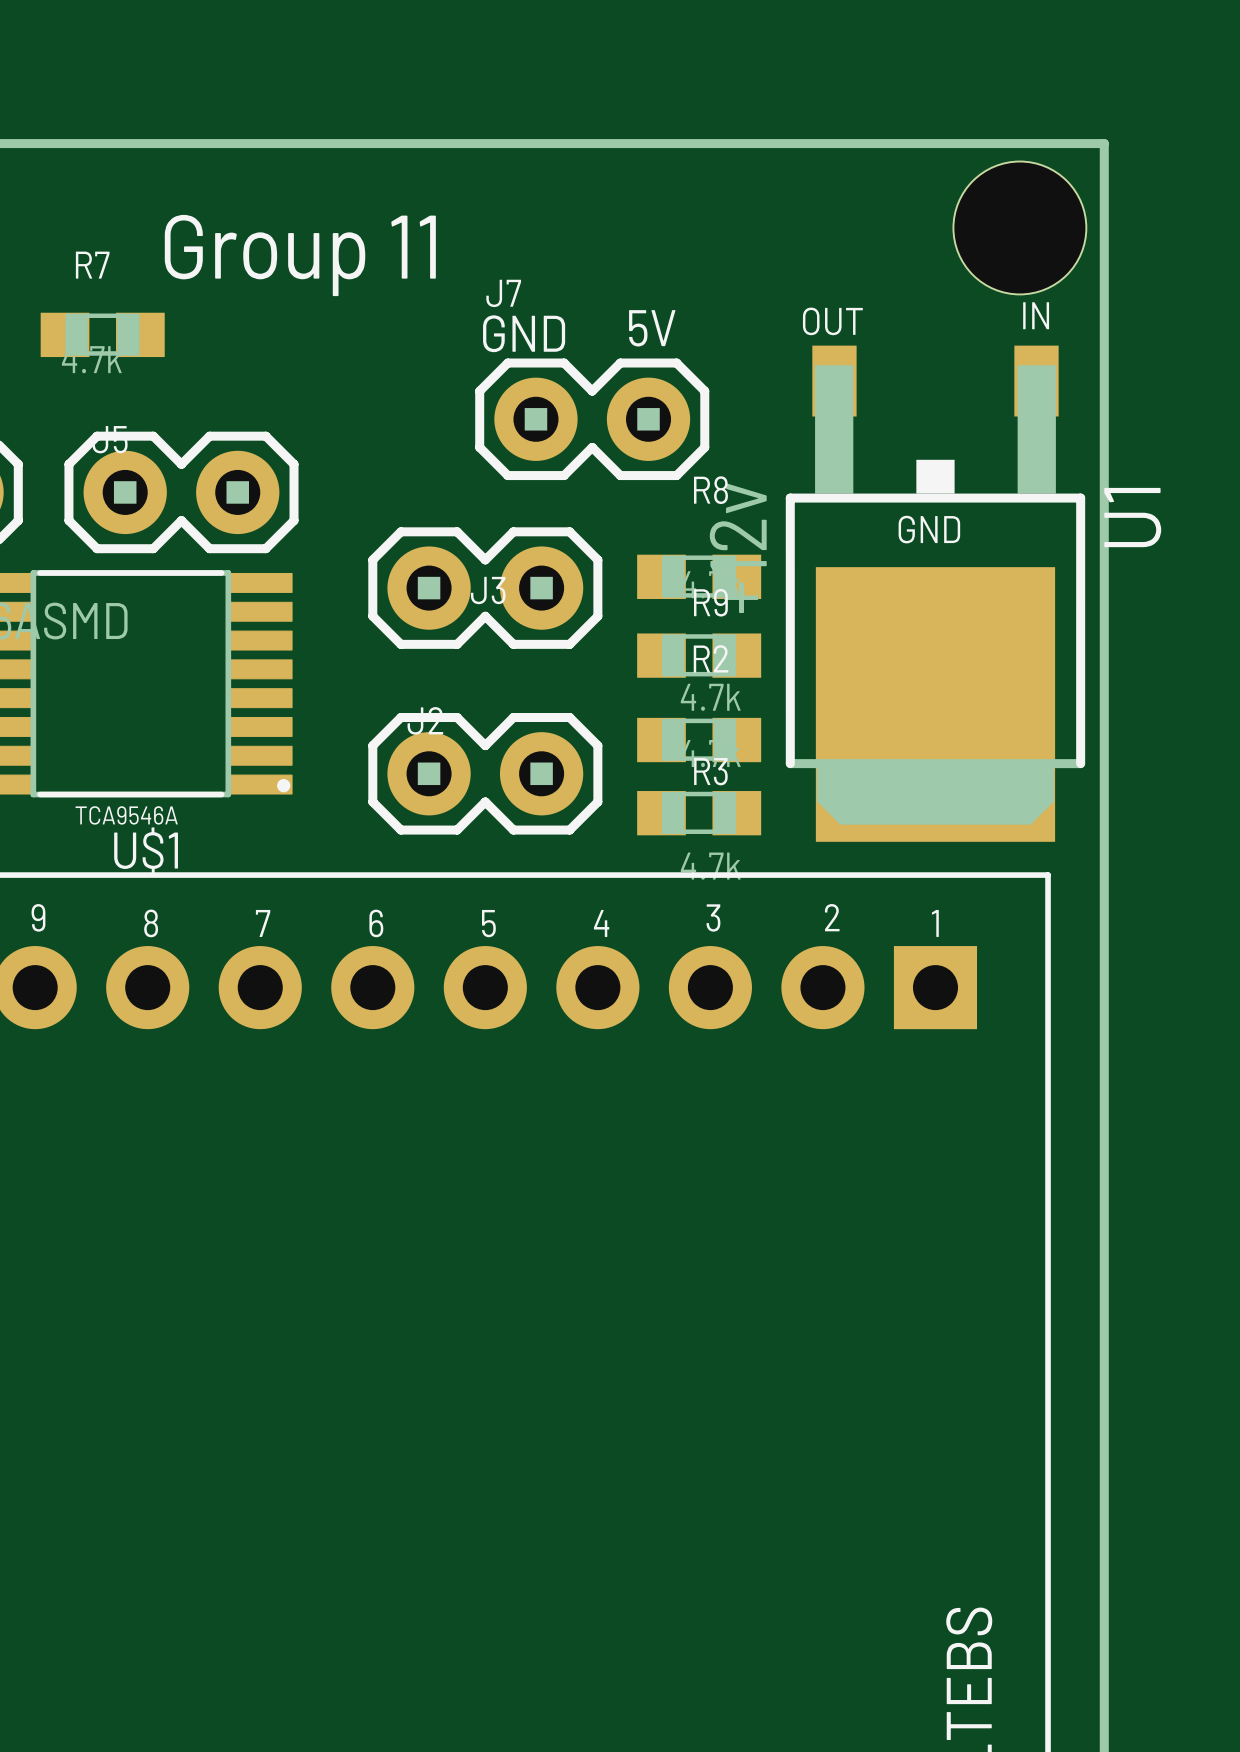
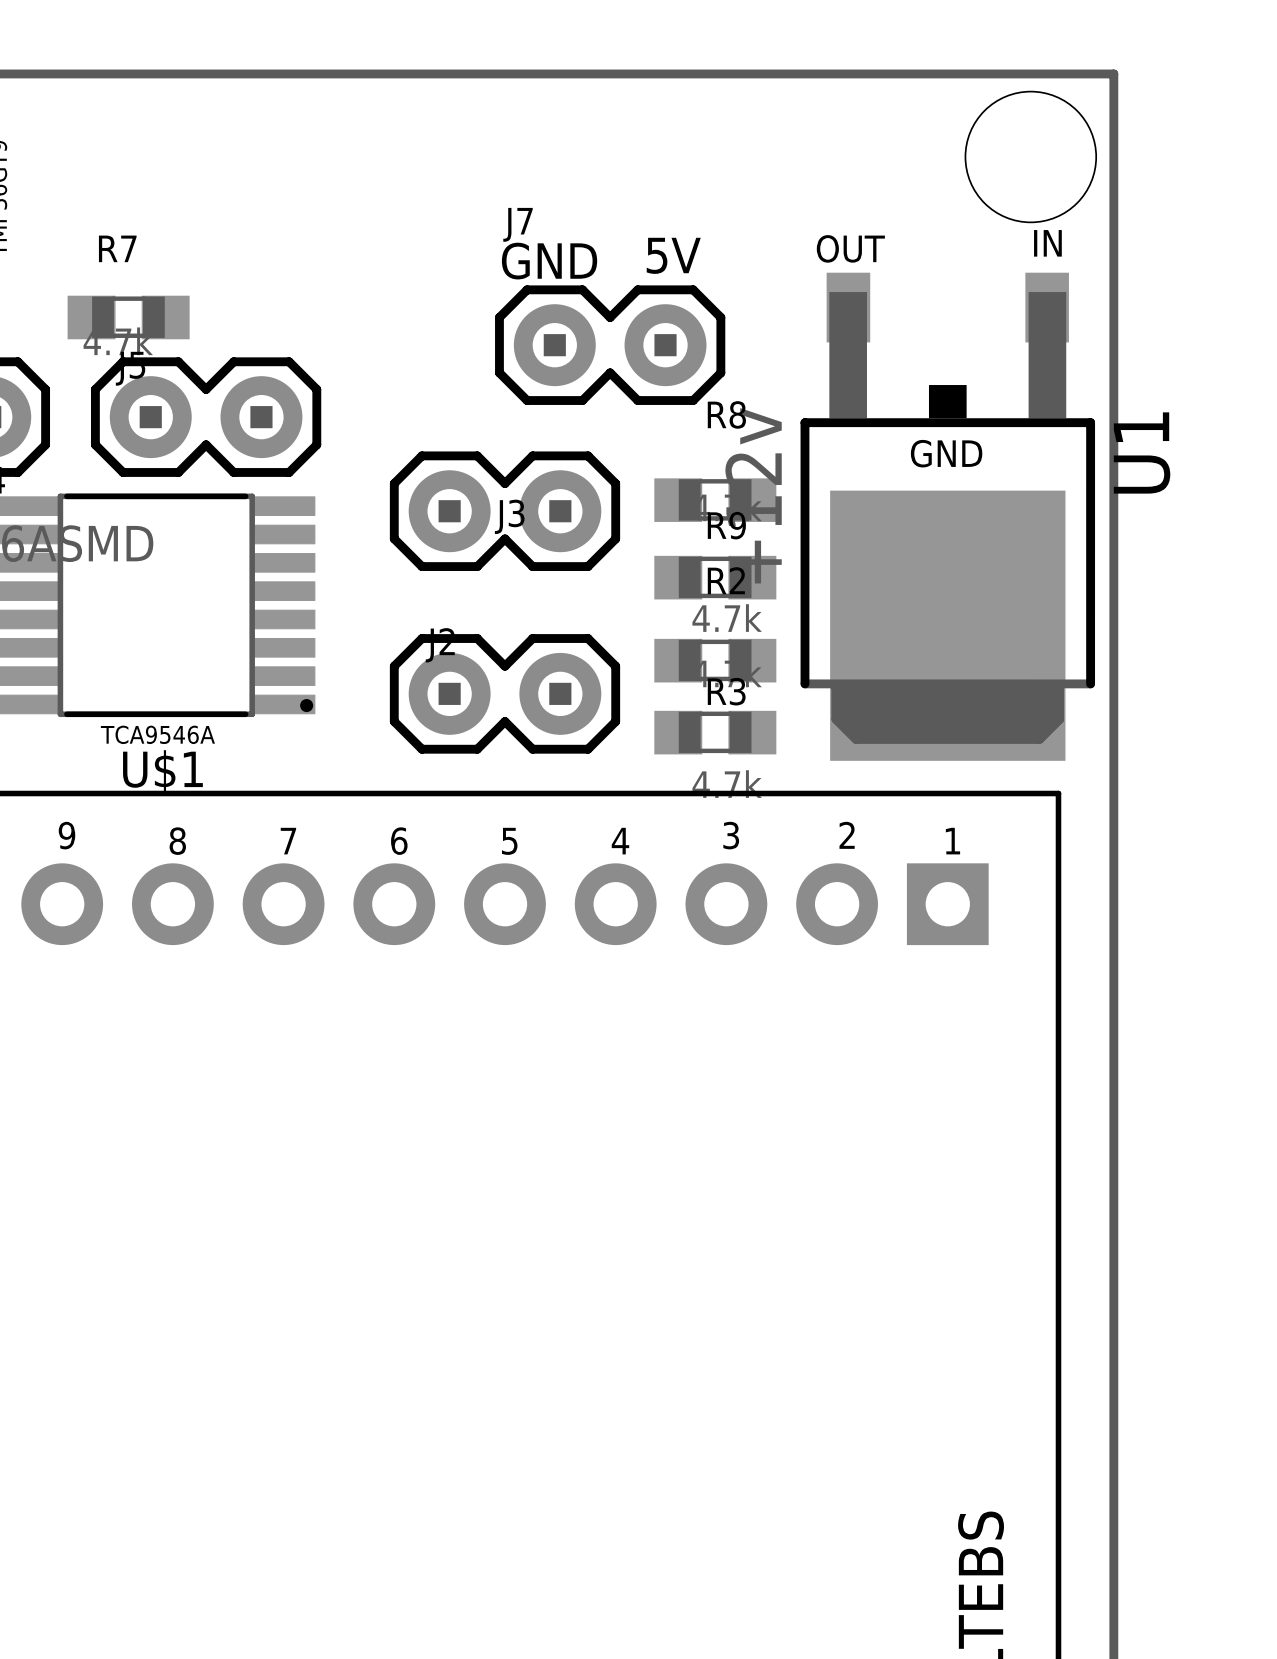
text: Group 11 (300, 255) -> none
R7 position: (102, 334) -> (128, 317)

